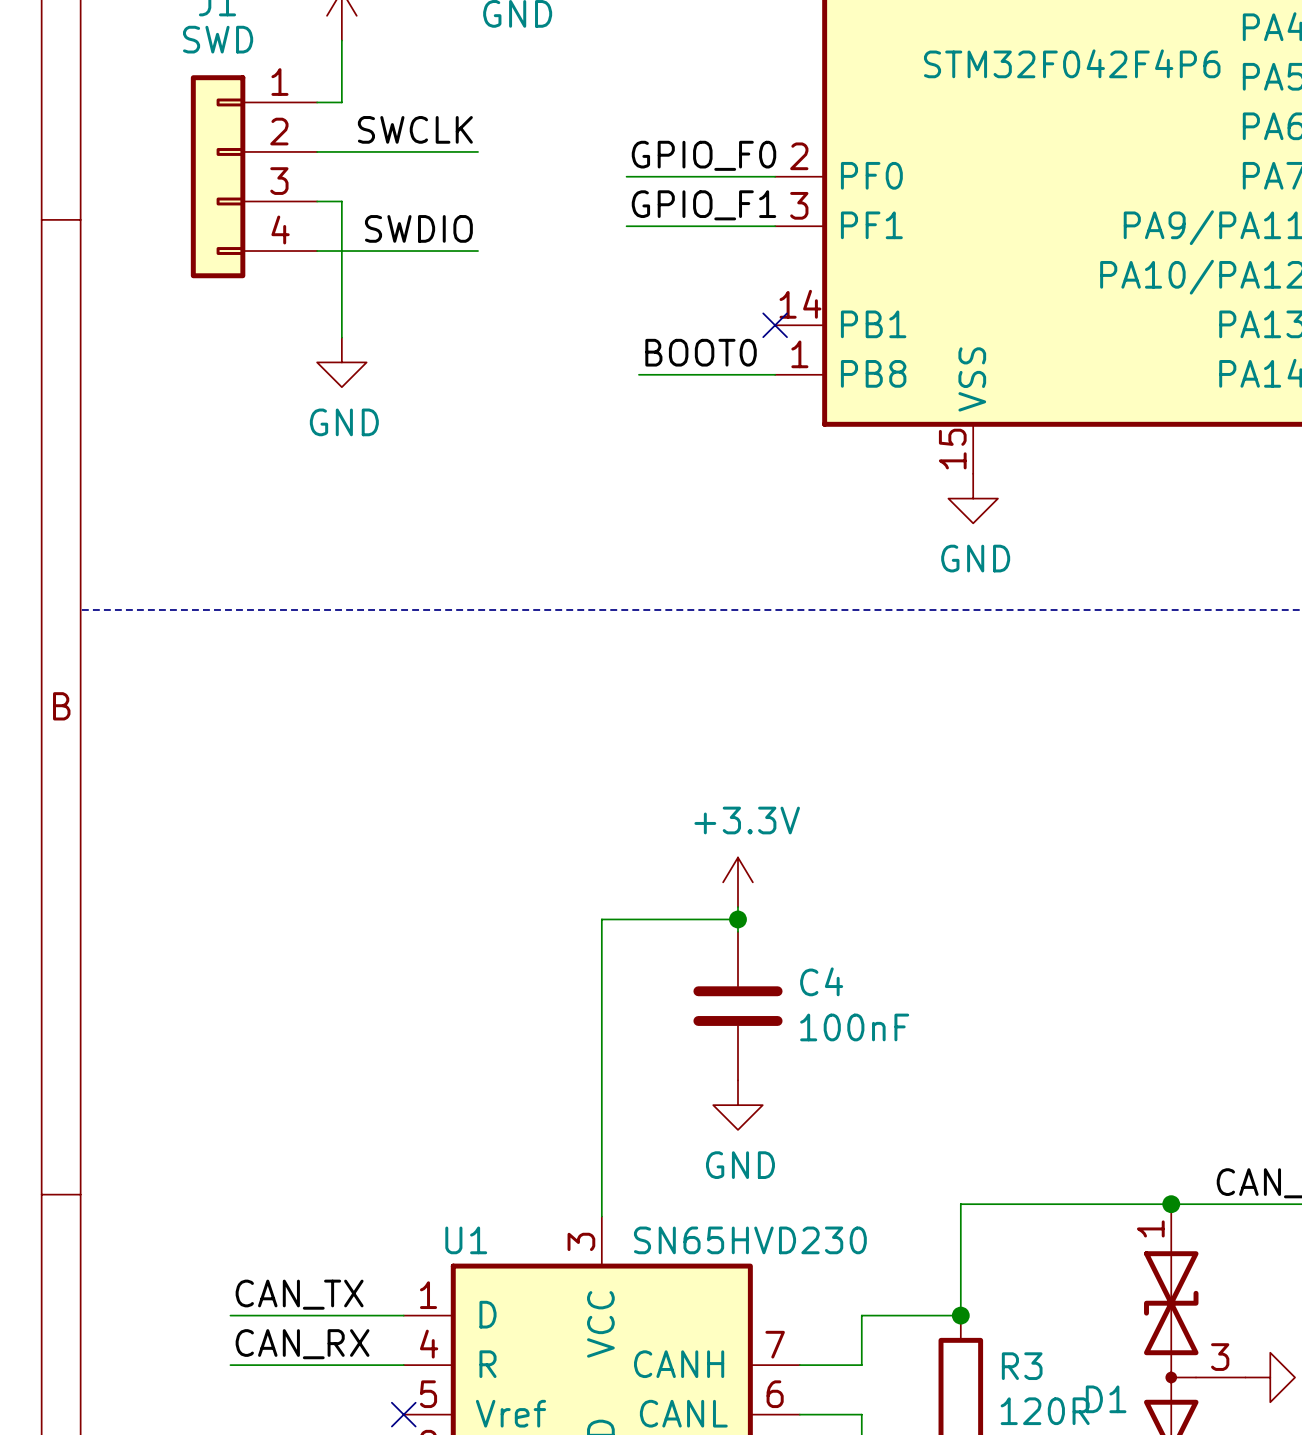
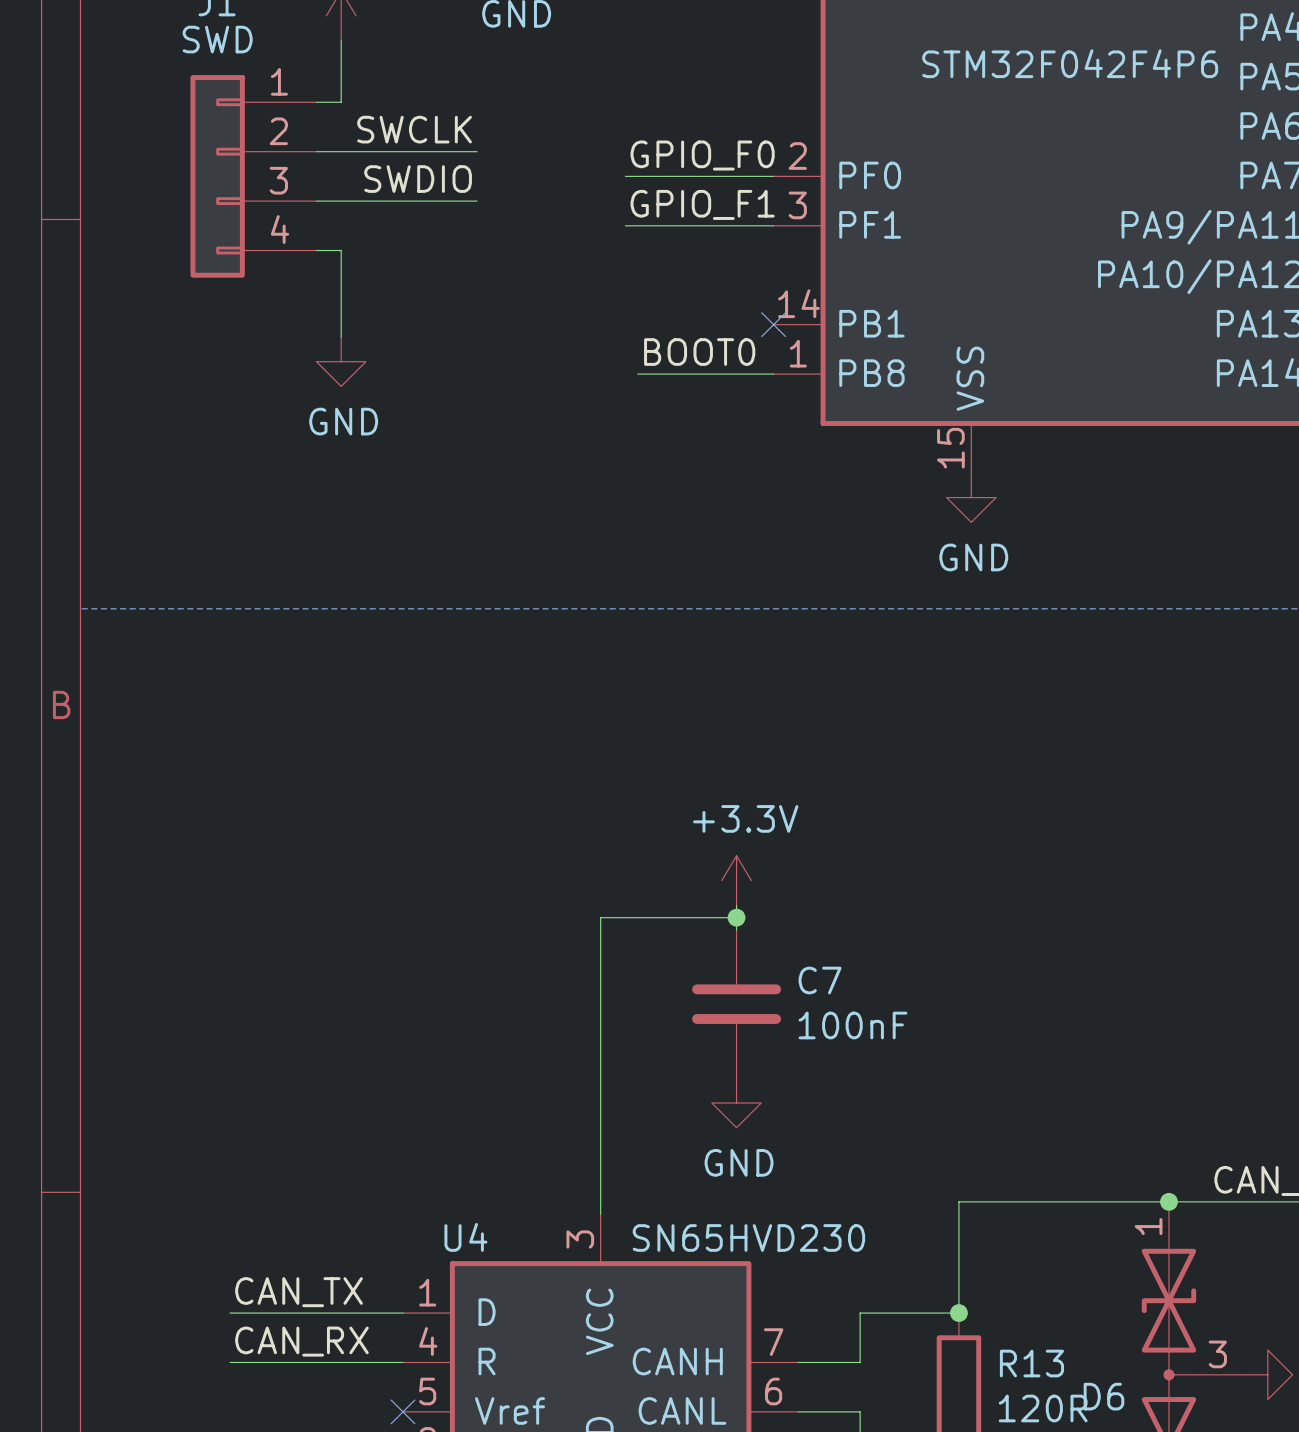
wire: (341, 201) (341, 251) (478, 251) -> (341, 201) (477, 201)
label position: SWDIO (418, 228) -> SWDIO (418, 179)
C4 name: C4 (821, 981) -> C7 (820, 980)
U1 name: U1 (466, 1240) -> U4 (465, 1237)
R3 name: R3 (1022, 1366) -> R13 (1031, 1363)
D1 name: D1 (1106, 1399) -> D6 (1103, 1396)

